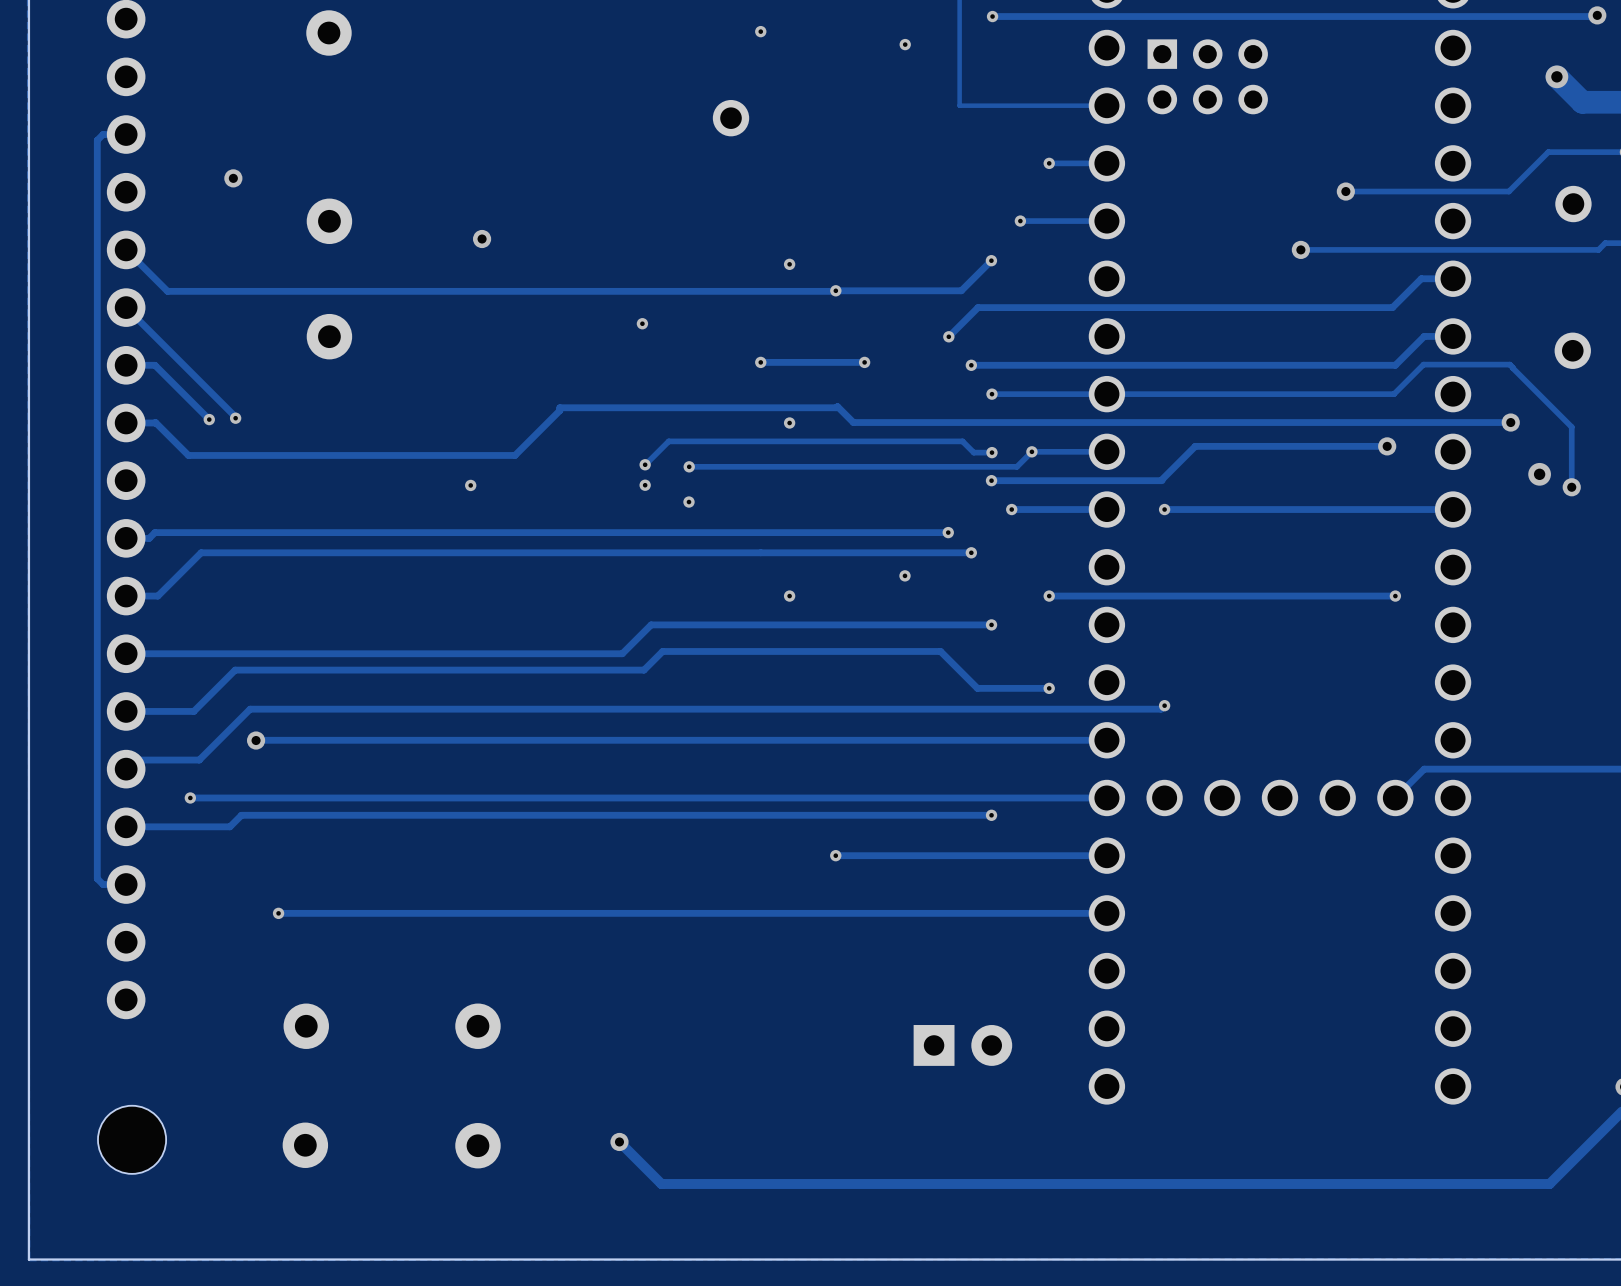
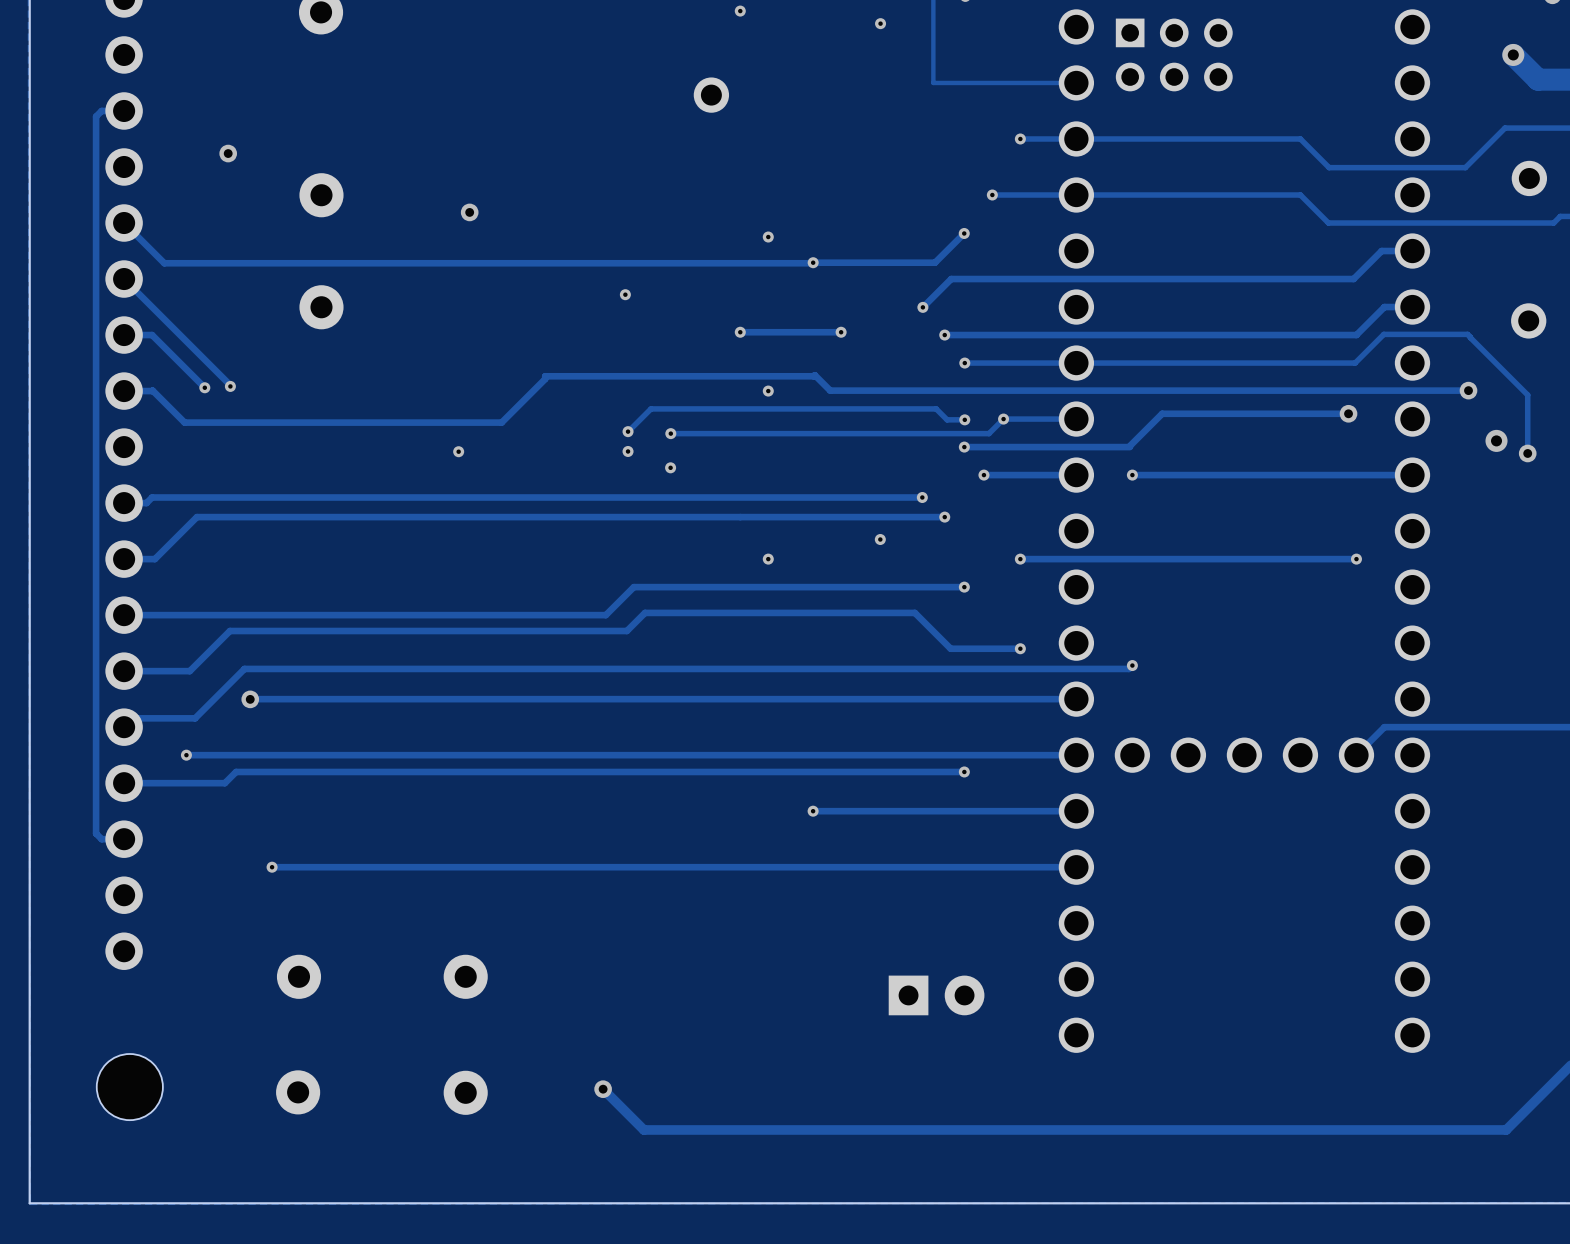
via: (1345, 191) -> none
track: (1508, 191) (1345, 191) -> (1466, 166) (1329, 167) (1300, 138) (1076, 138)
via: (1300, 249) -> none
track: (1366, 249) (1300, 249) -> (1328, 223) (1300, 195) (1076, 195)

